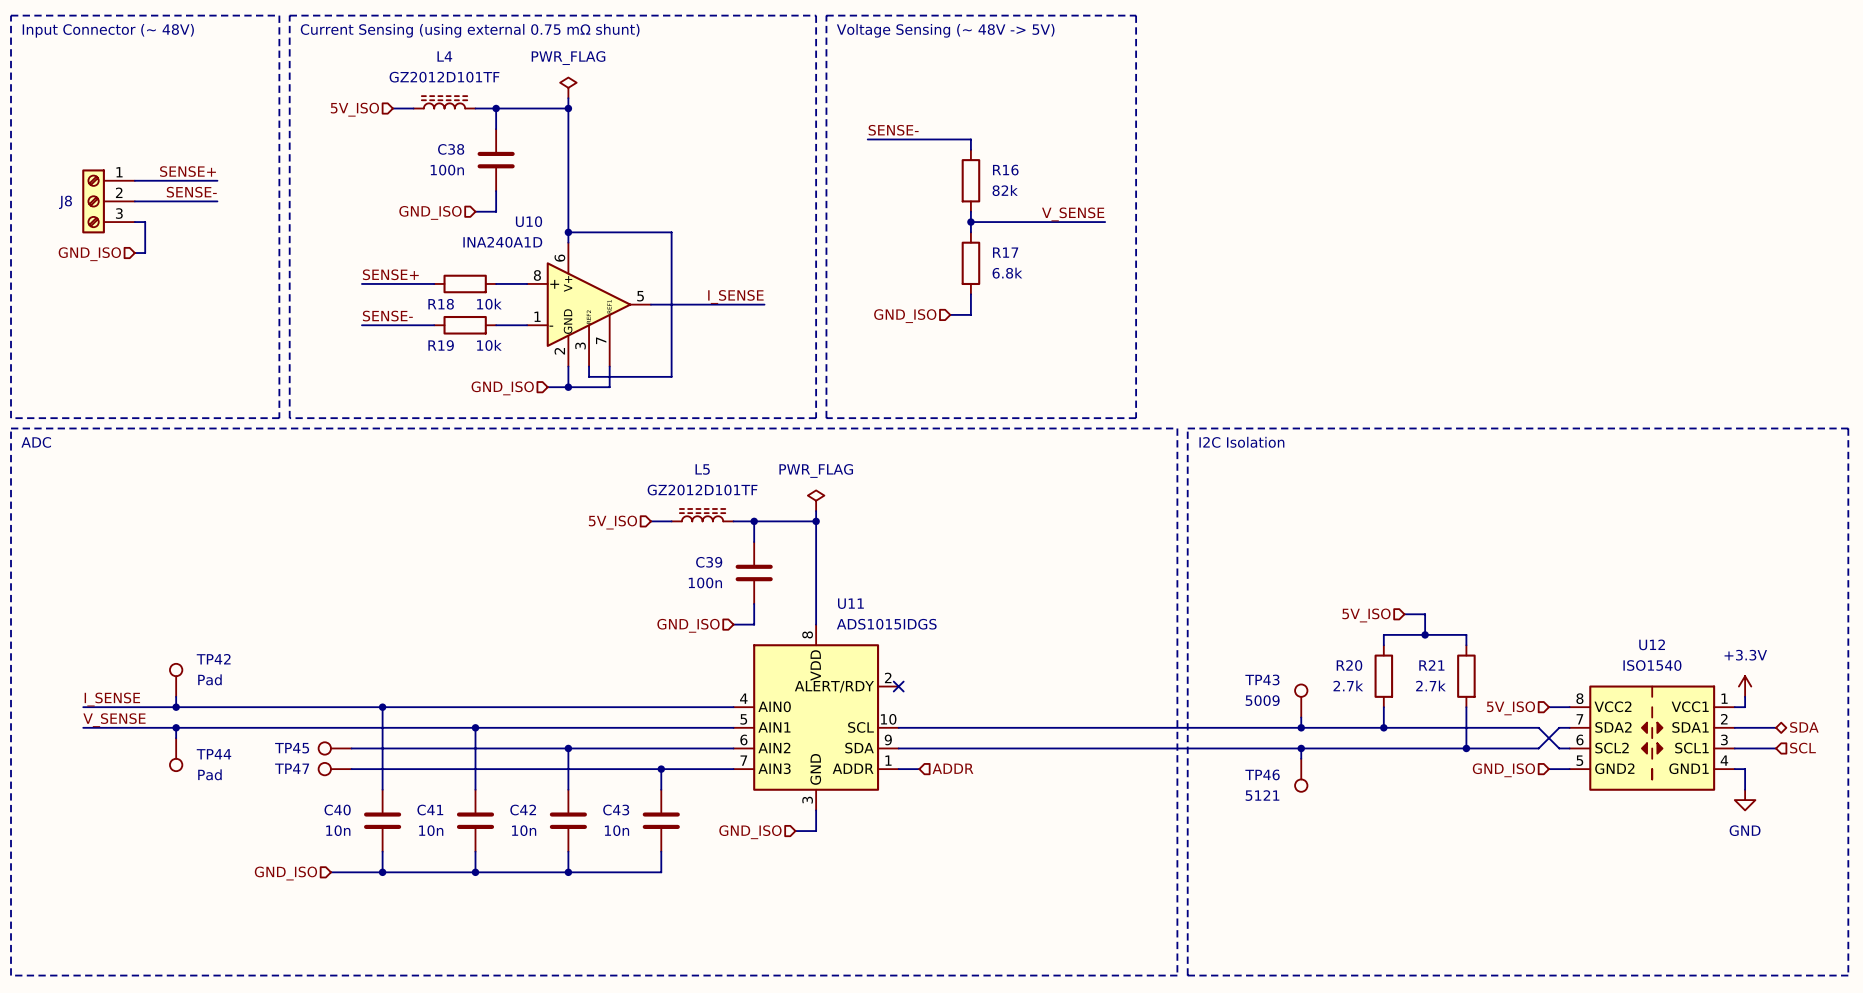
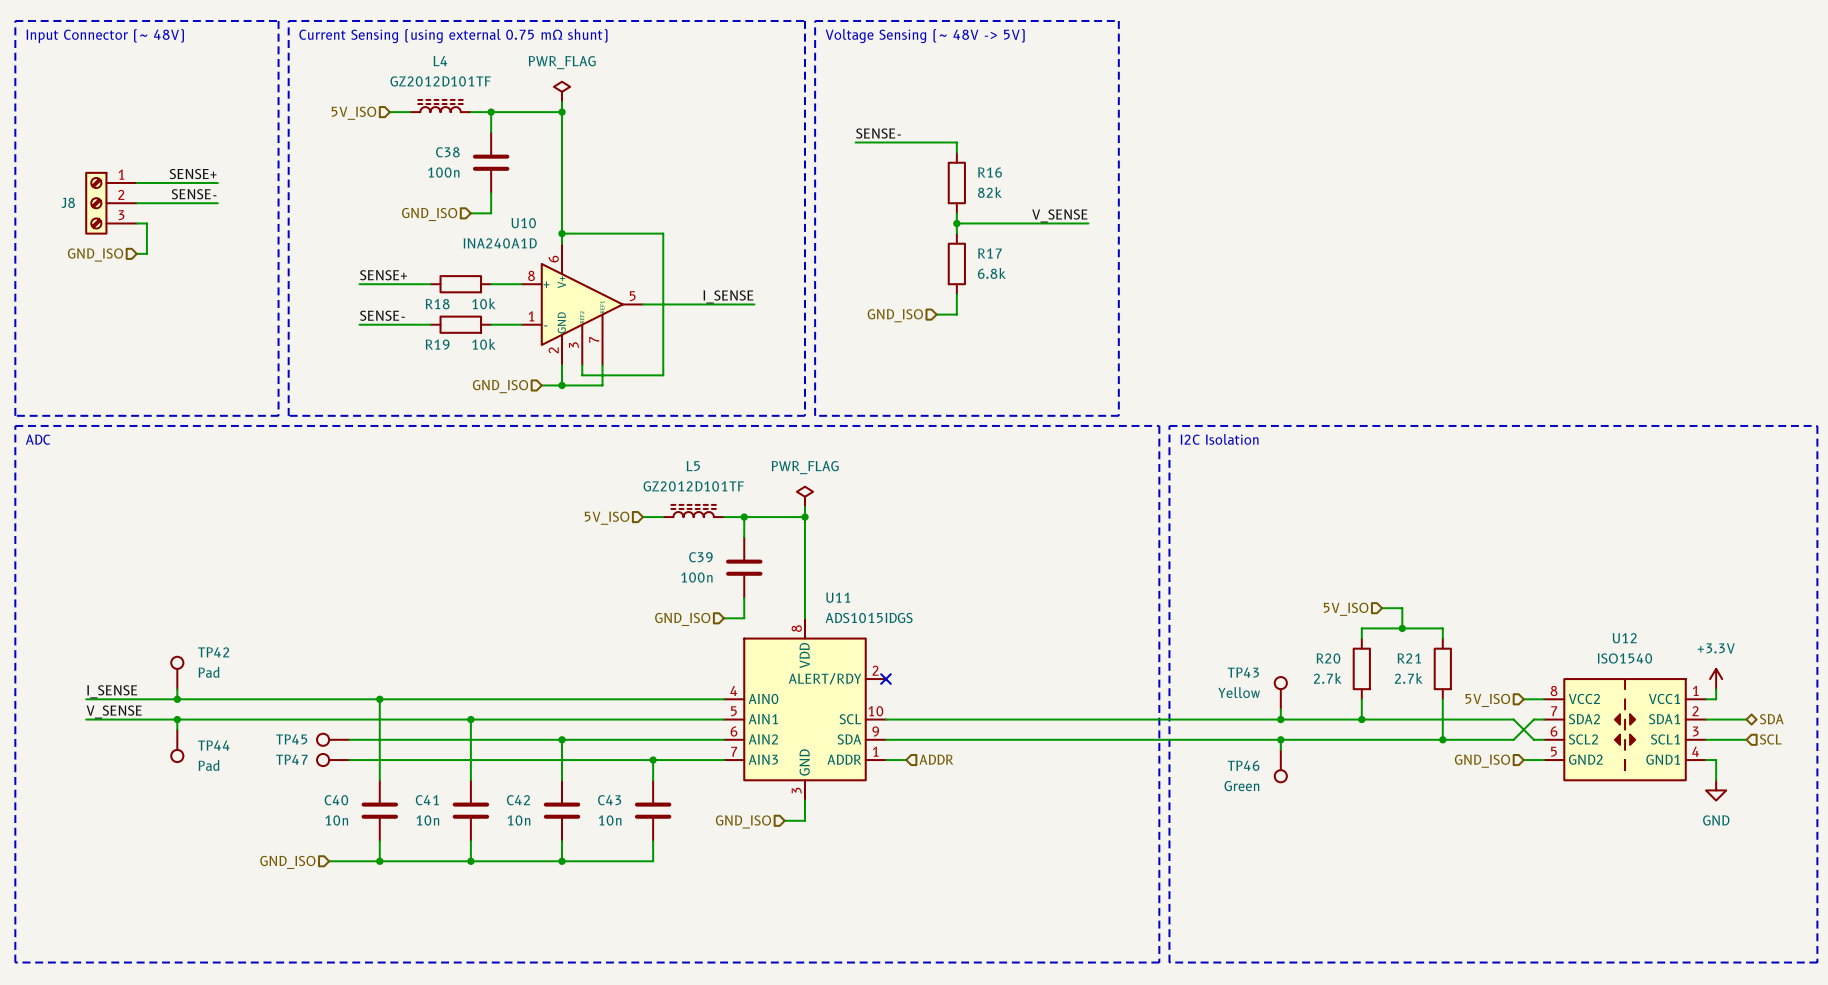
TP43 value: 5009 (1262, 700) -> Yellow (1239, 692)
TP46 value: 5121 (1262, 795) -> Green (1241, 786)

